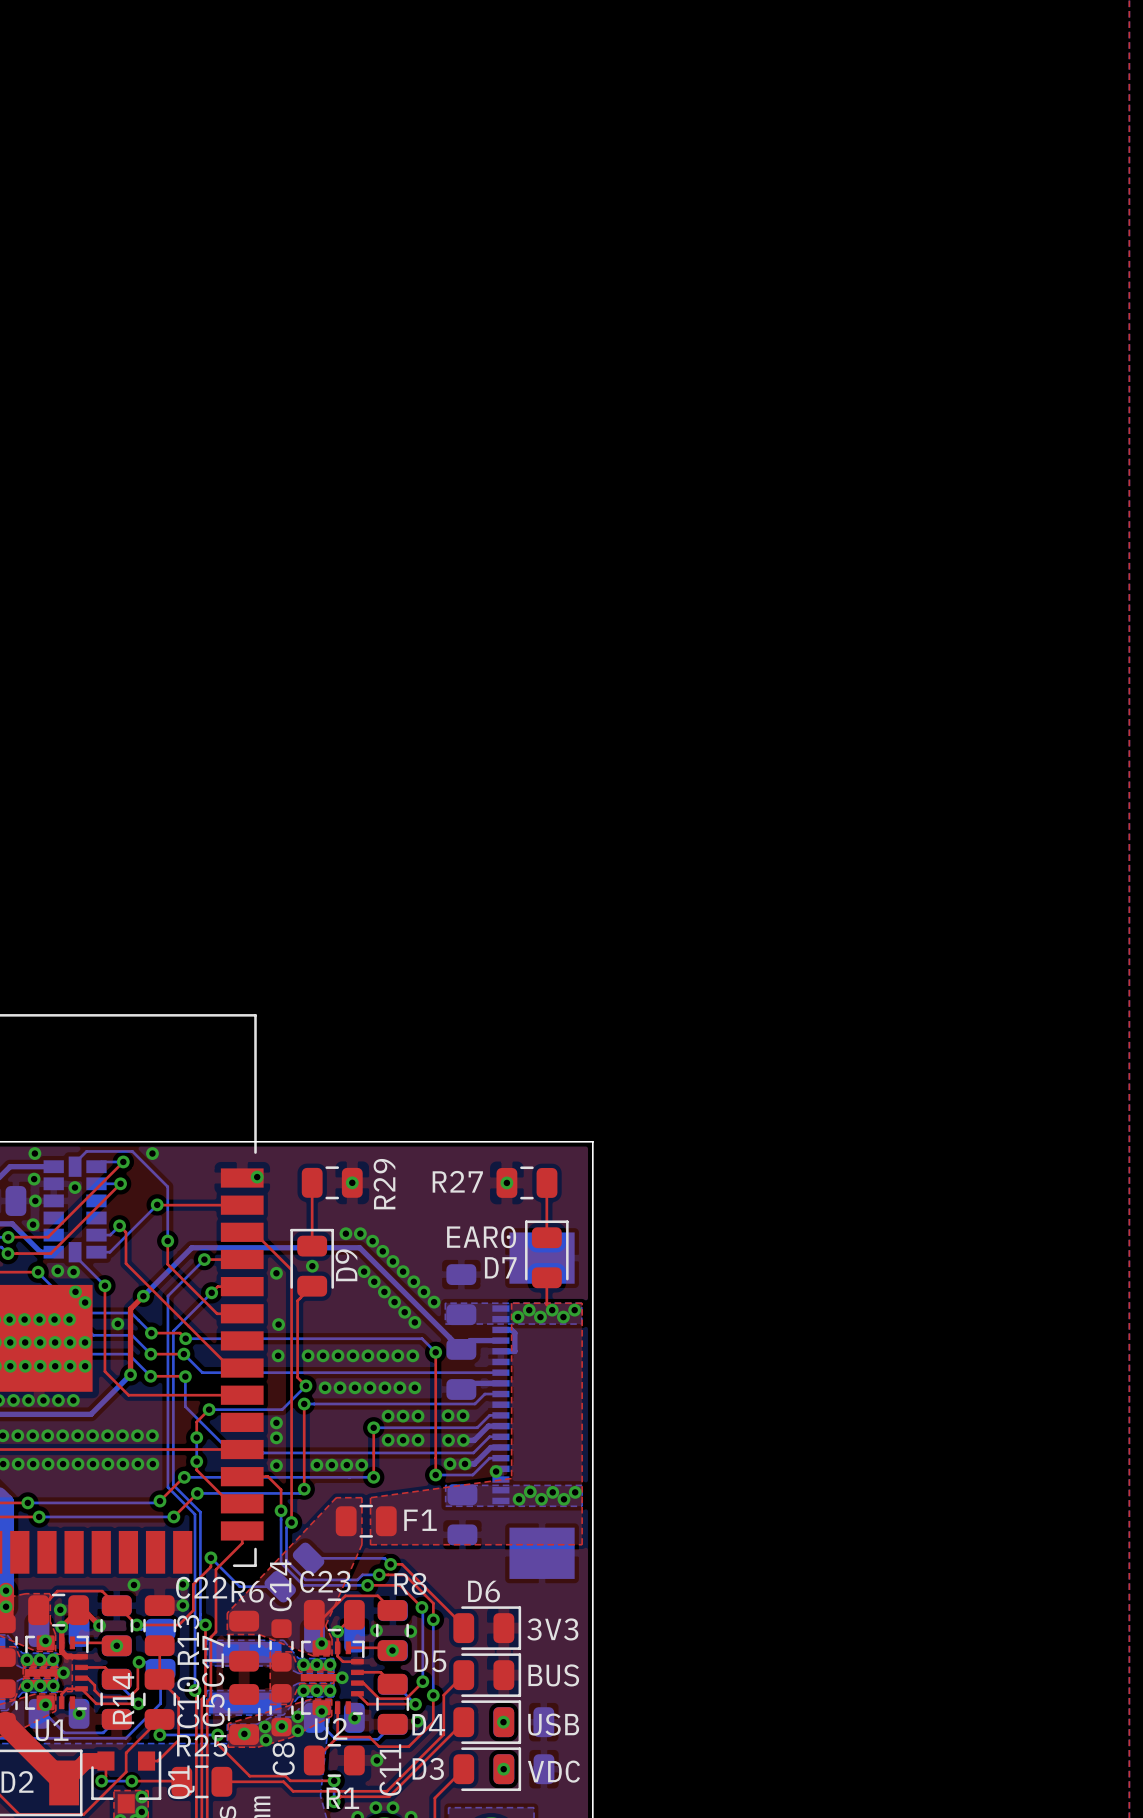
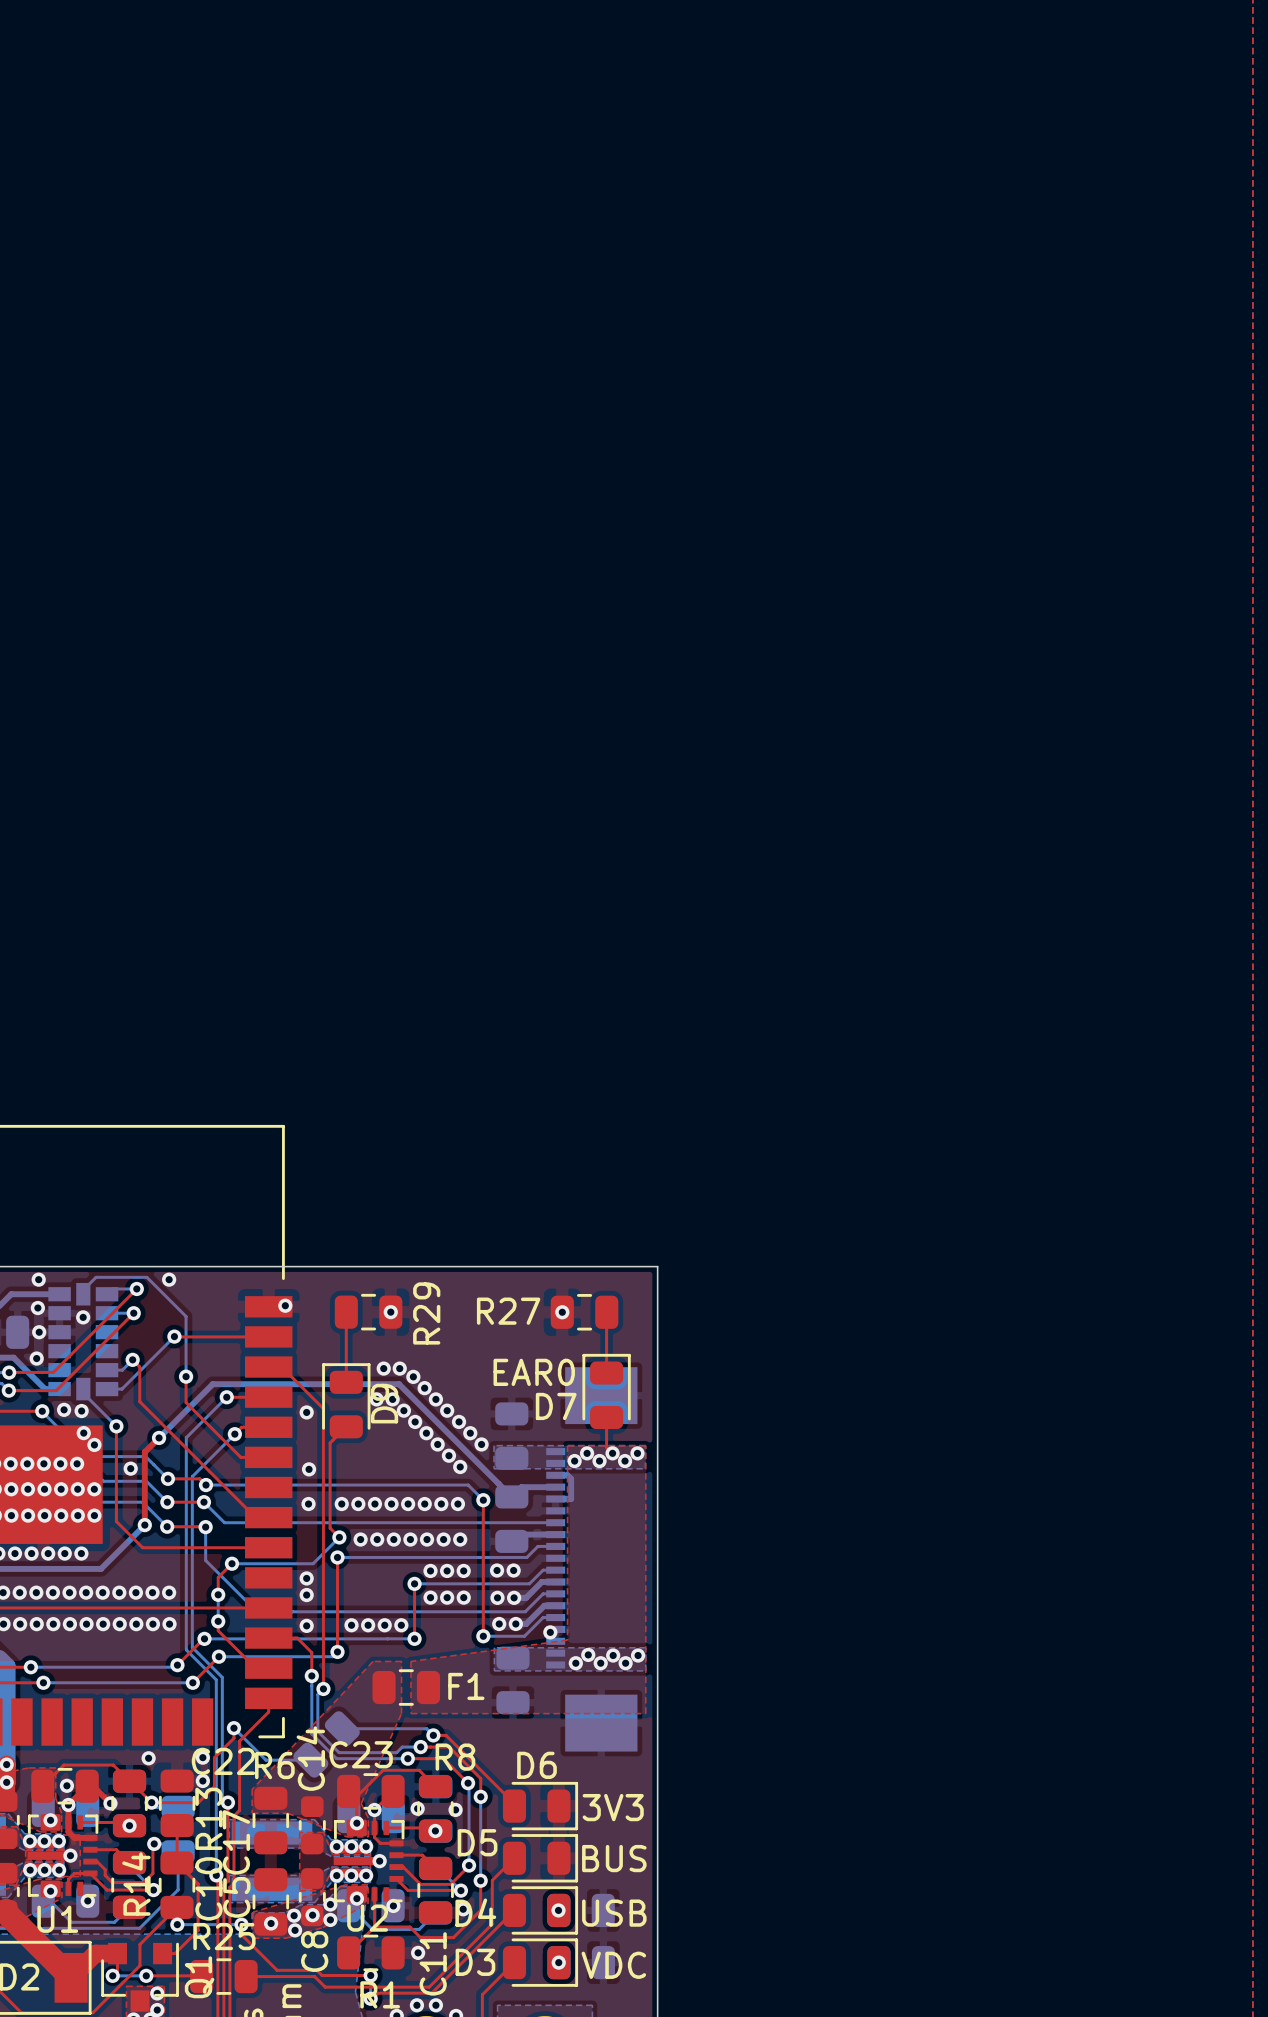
via: none -> (376, 1399)
via: none -> (392, 1399)
via: (312, 1266) -> none

